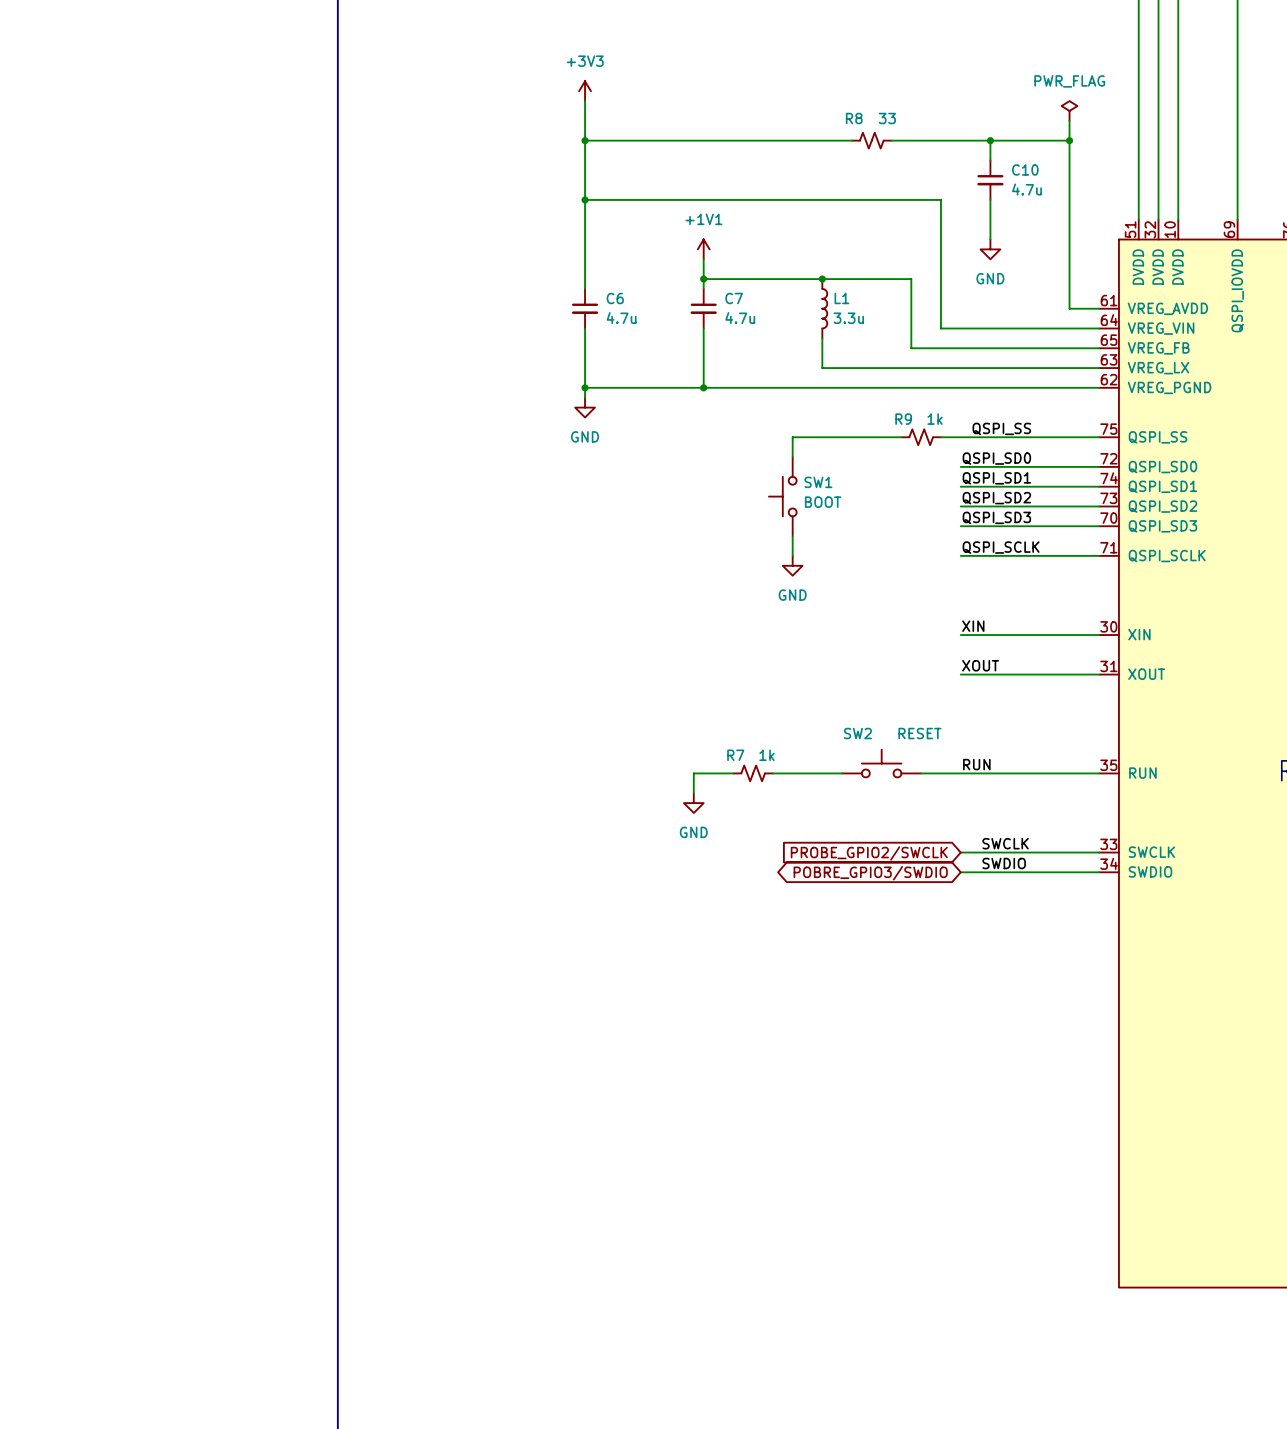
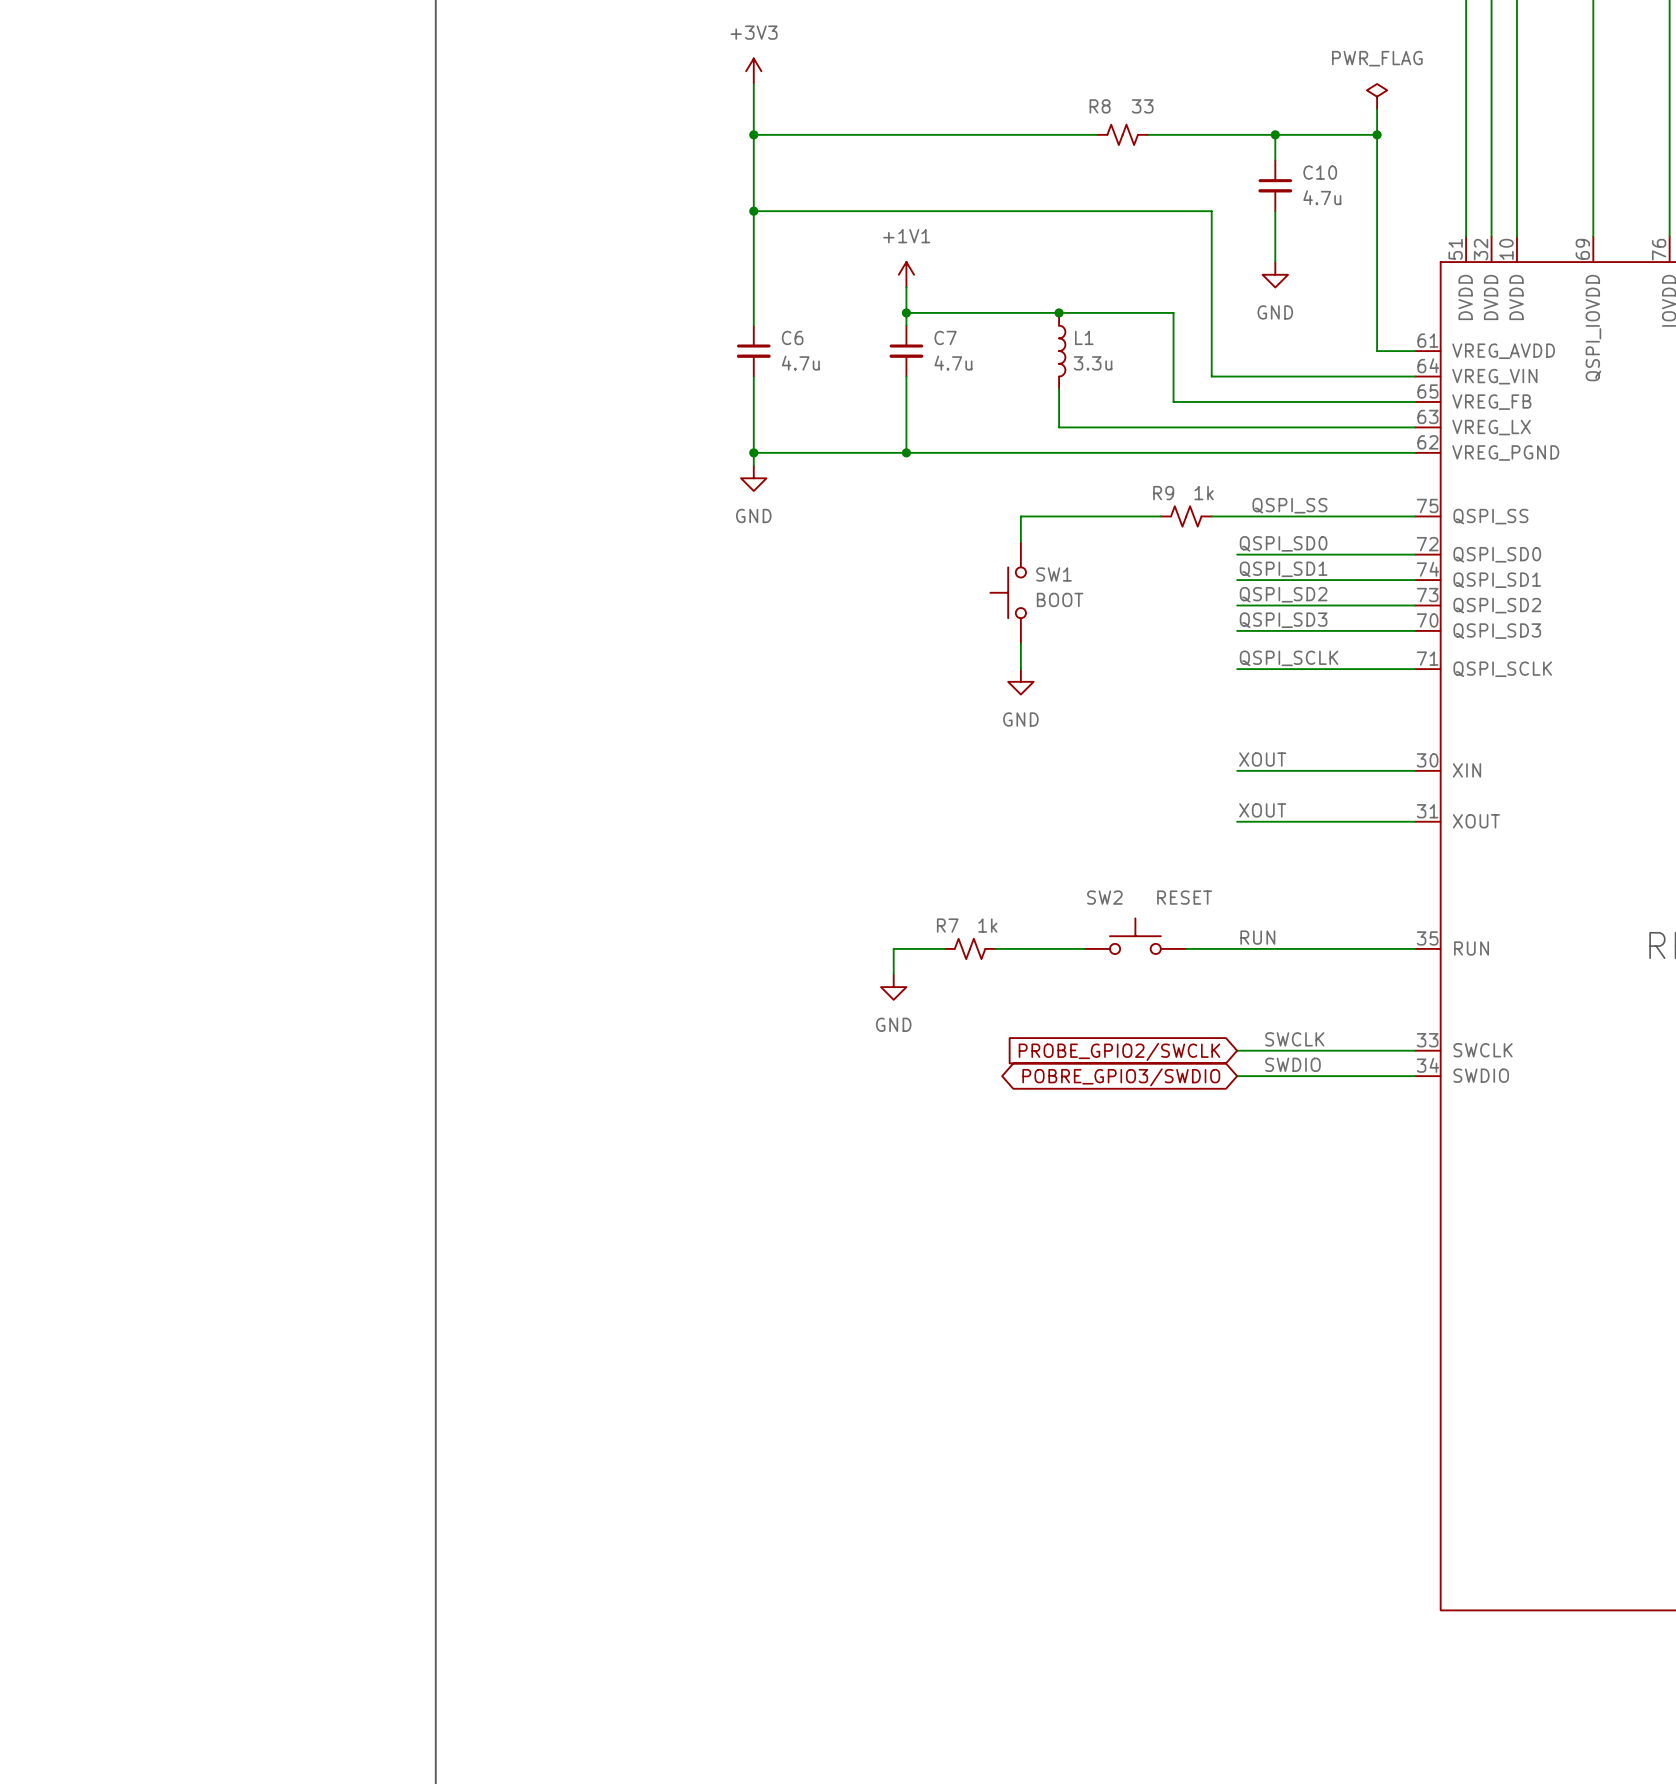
label: XIN (973, 626) -> XOUT (1262, 759)

